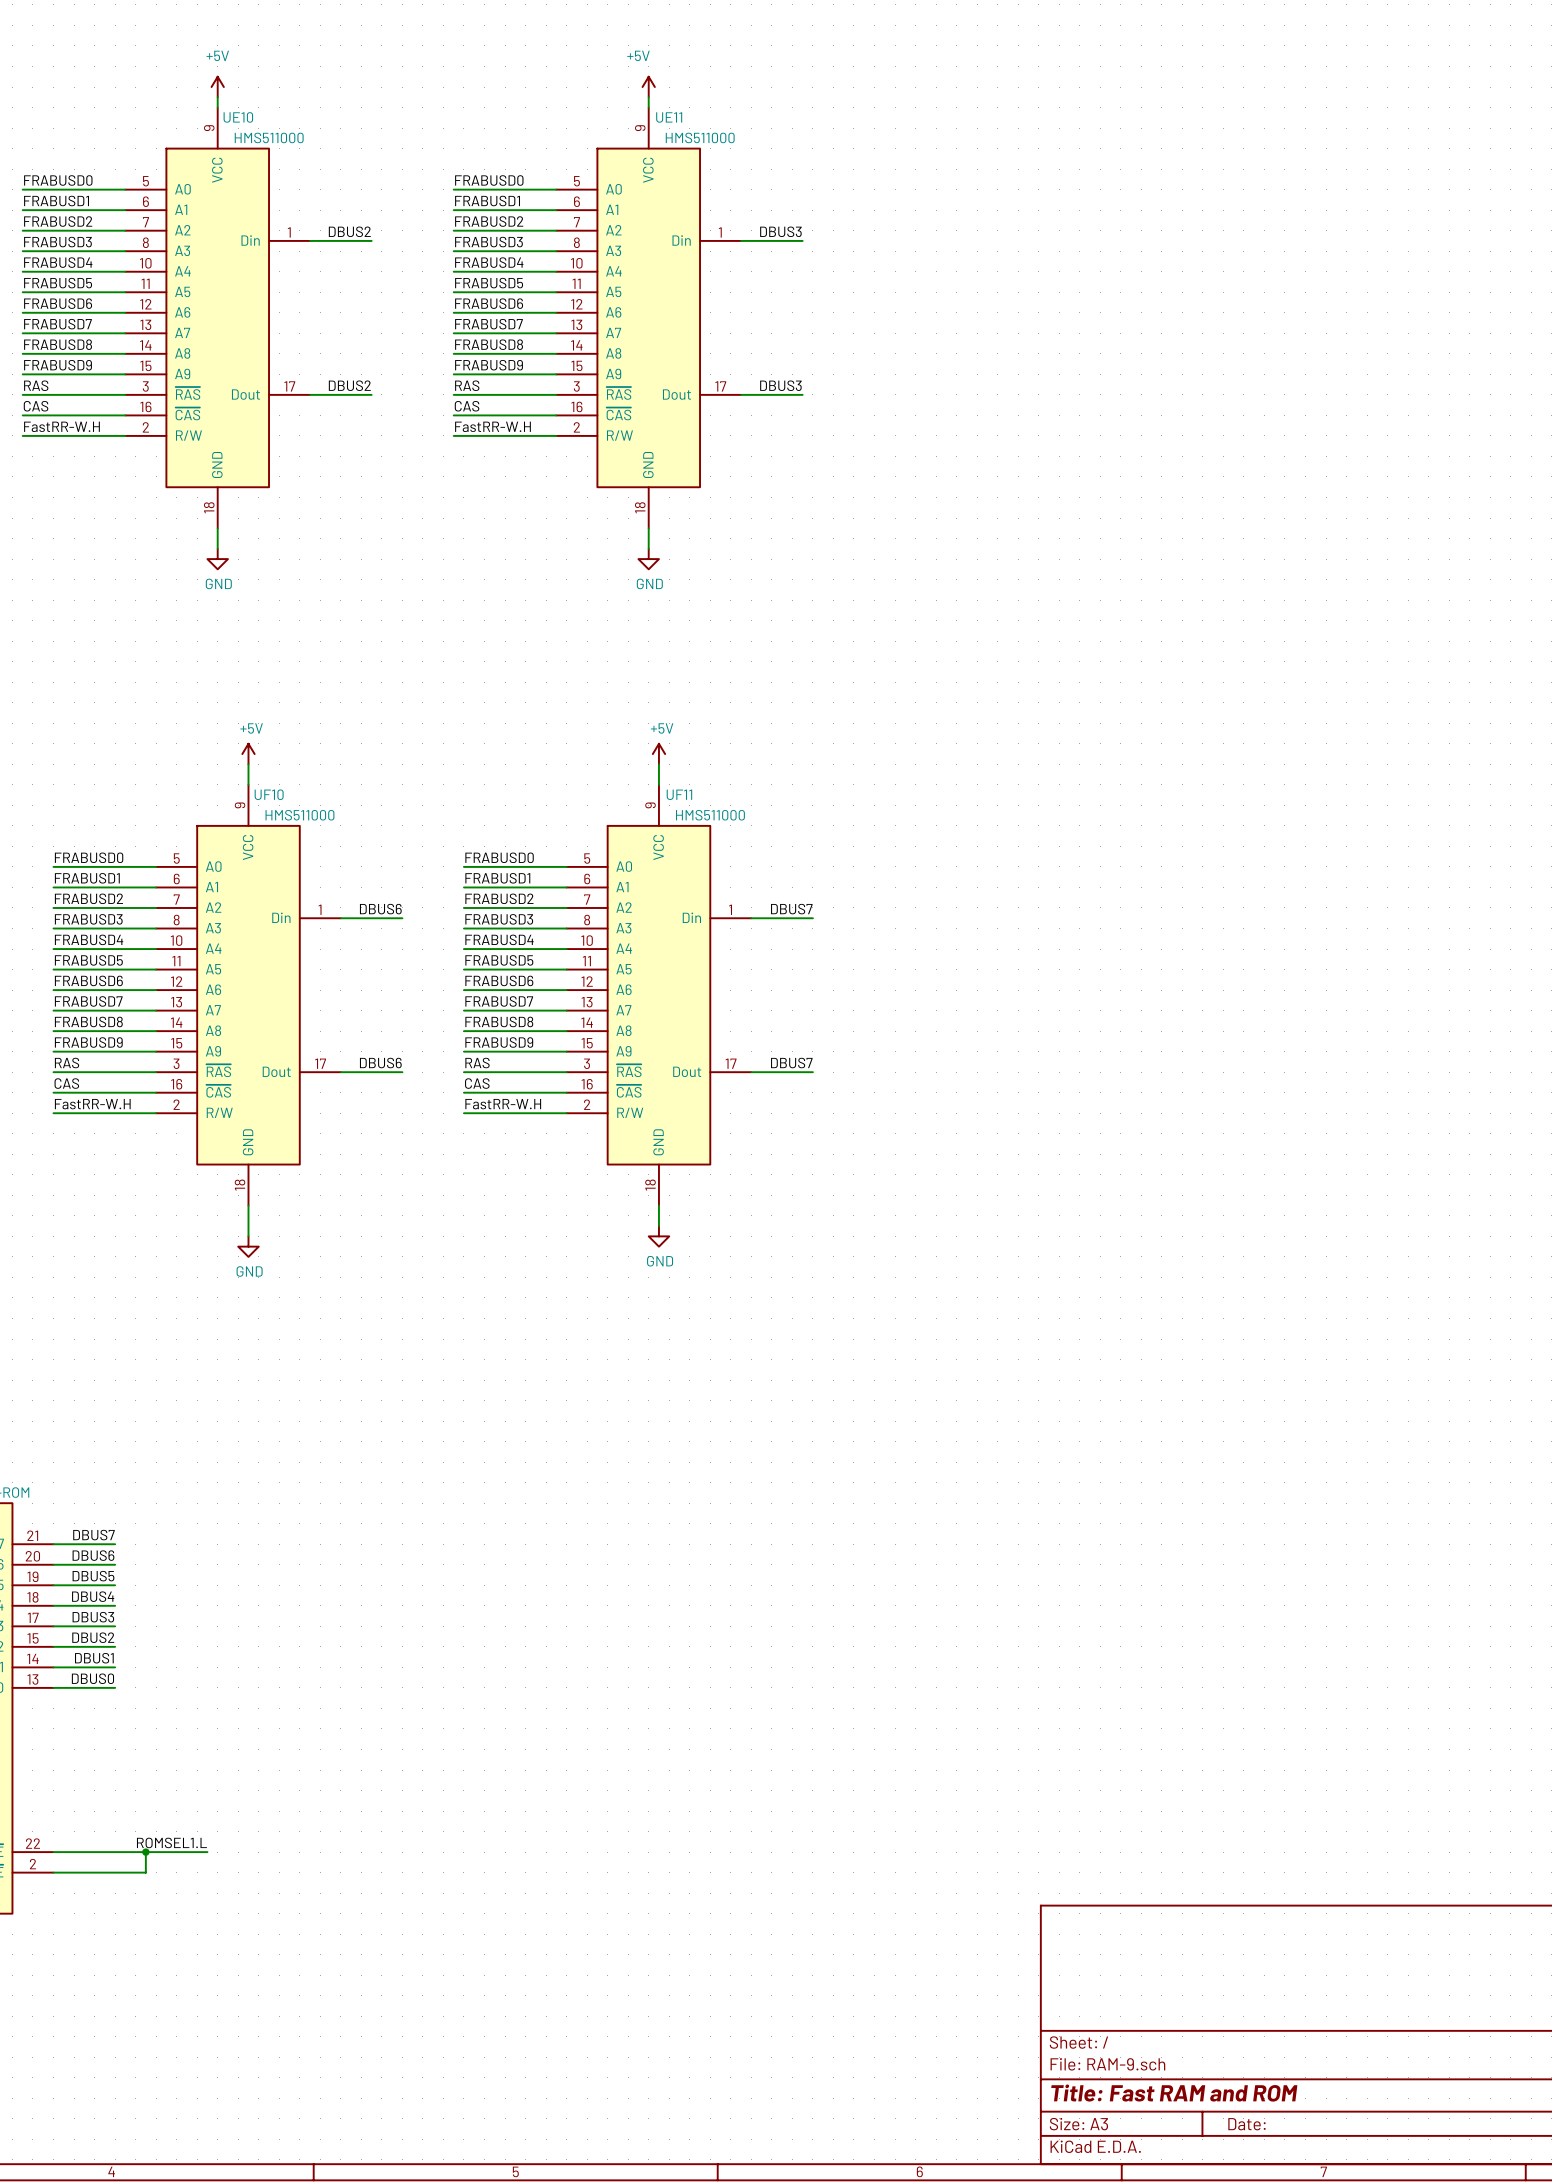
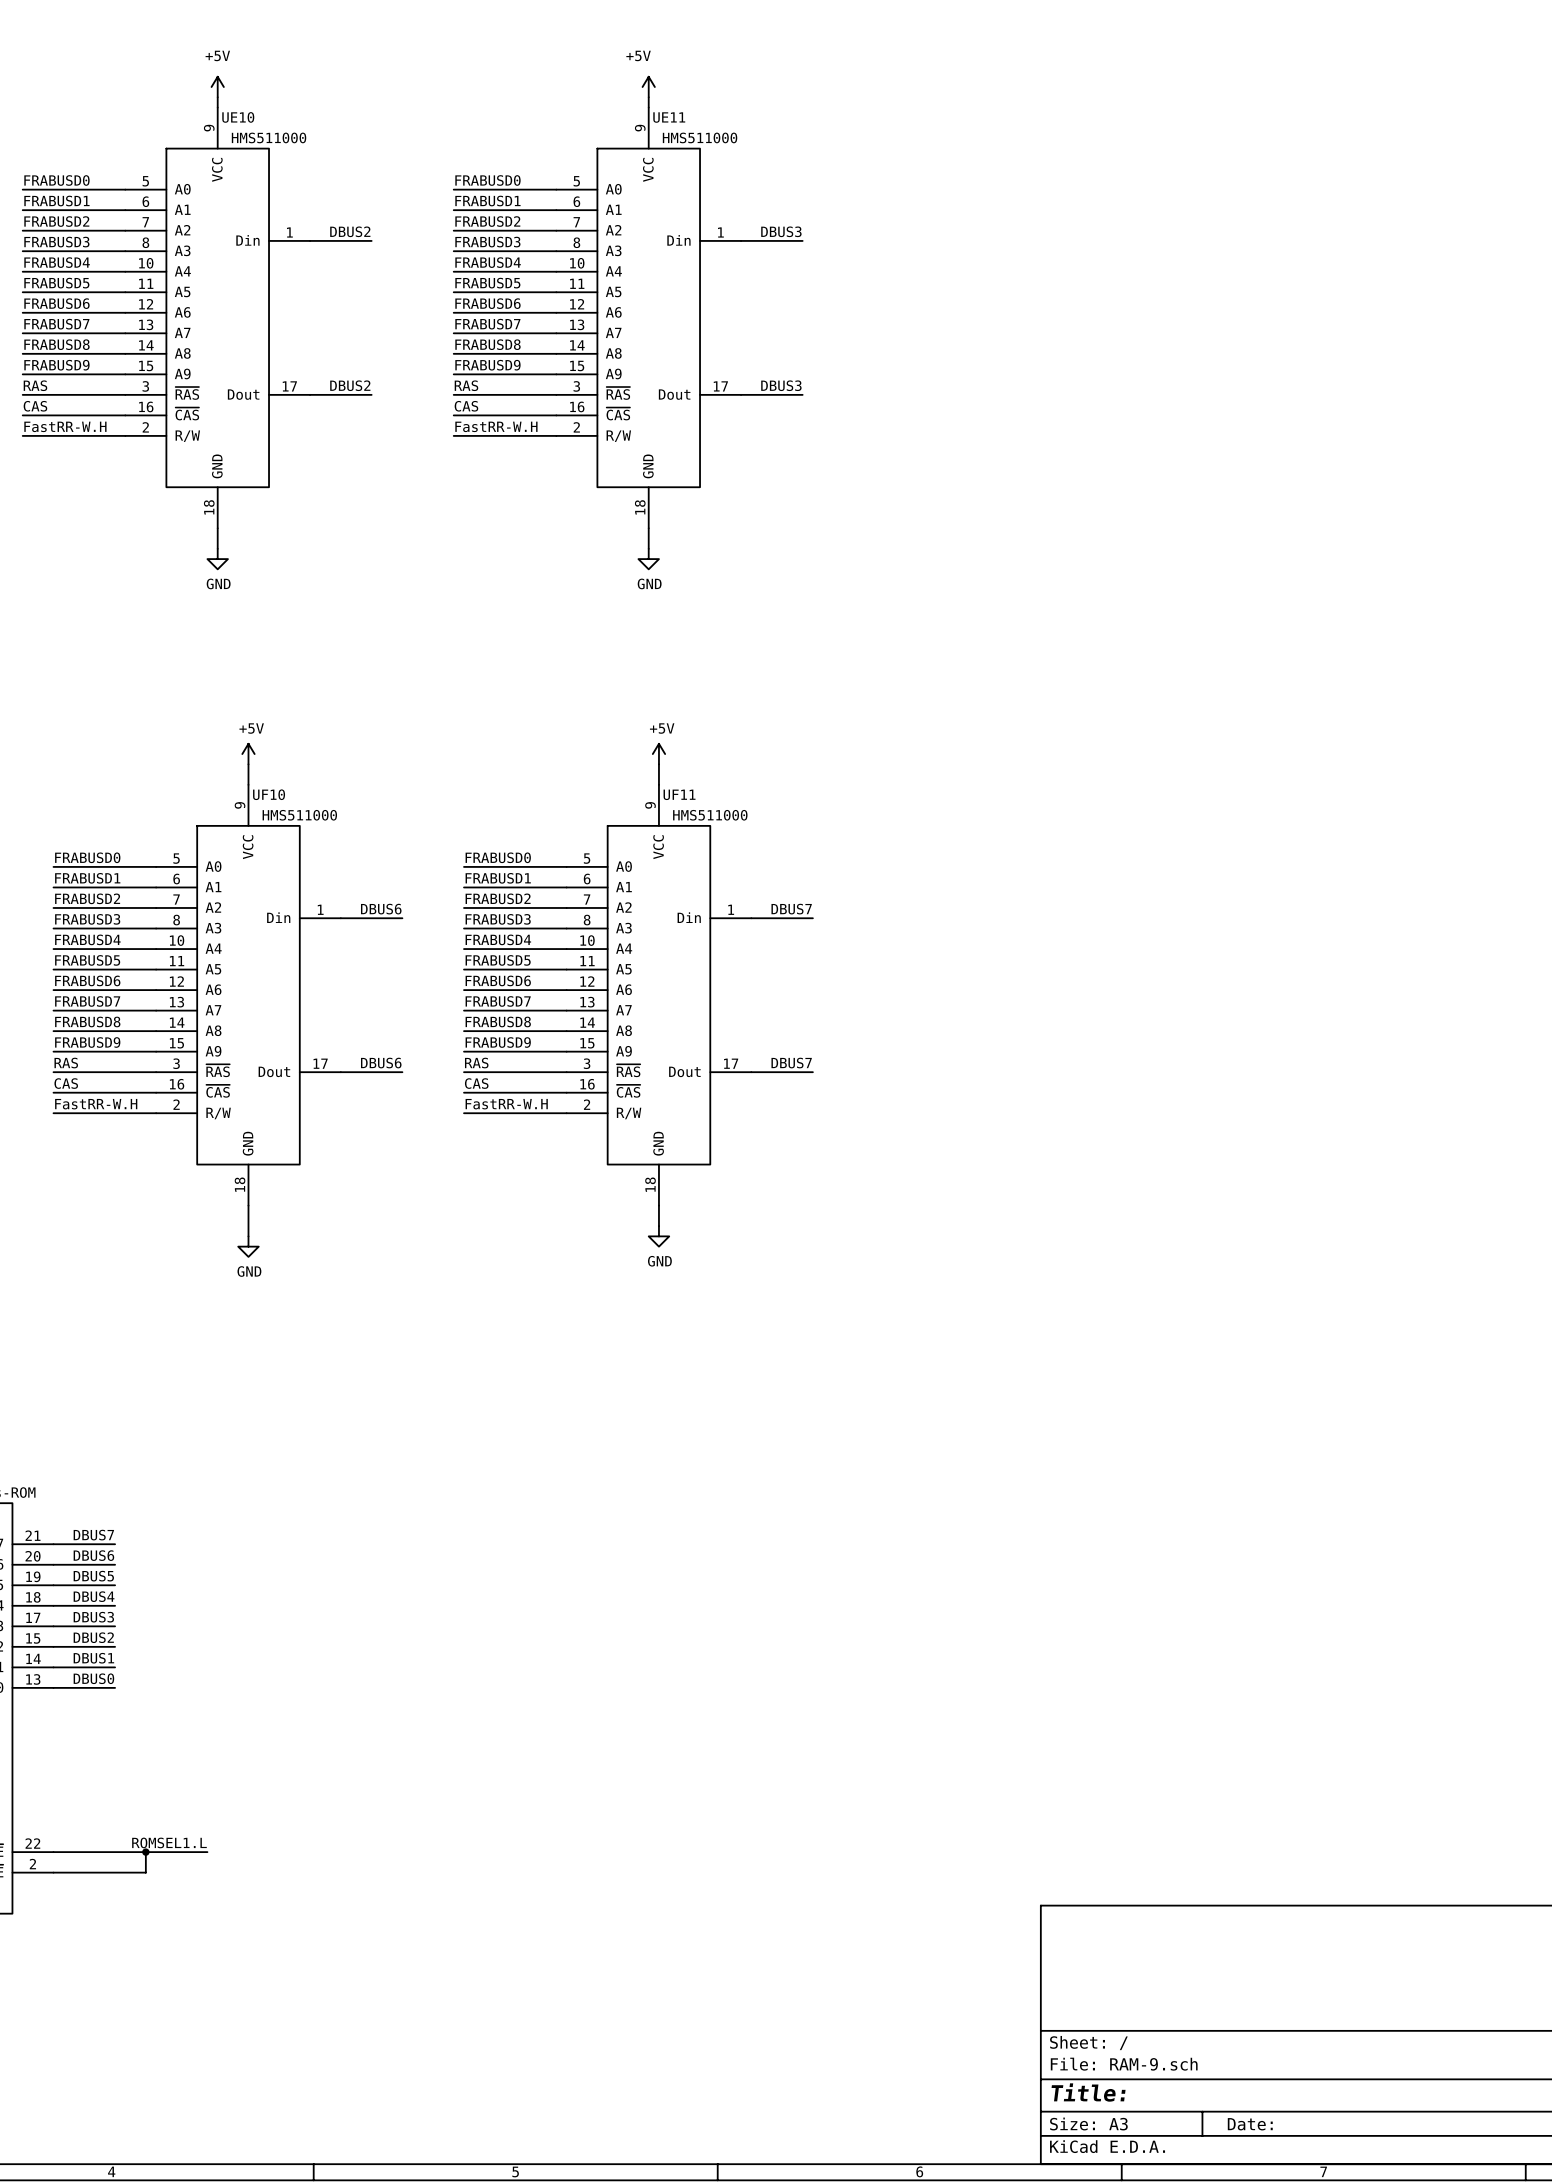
title block: Title: Fast RAM and ROM (1174, 2093) -> Title: (1088, 2092)

